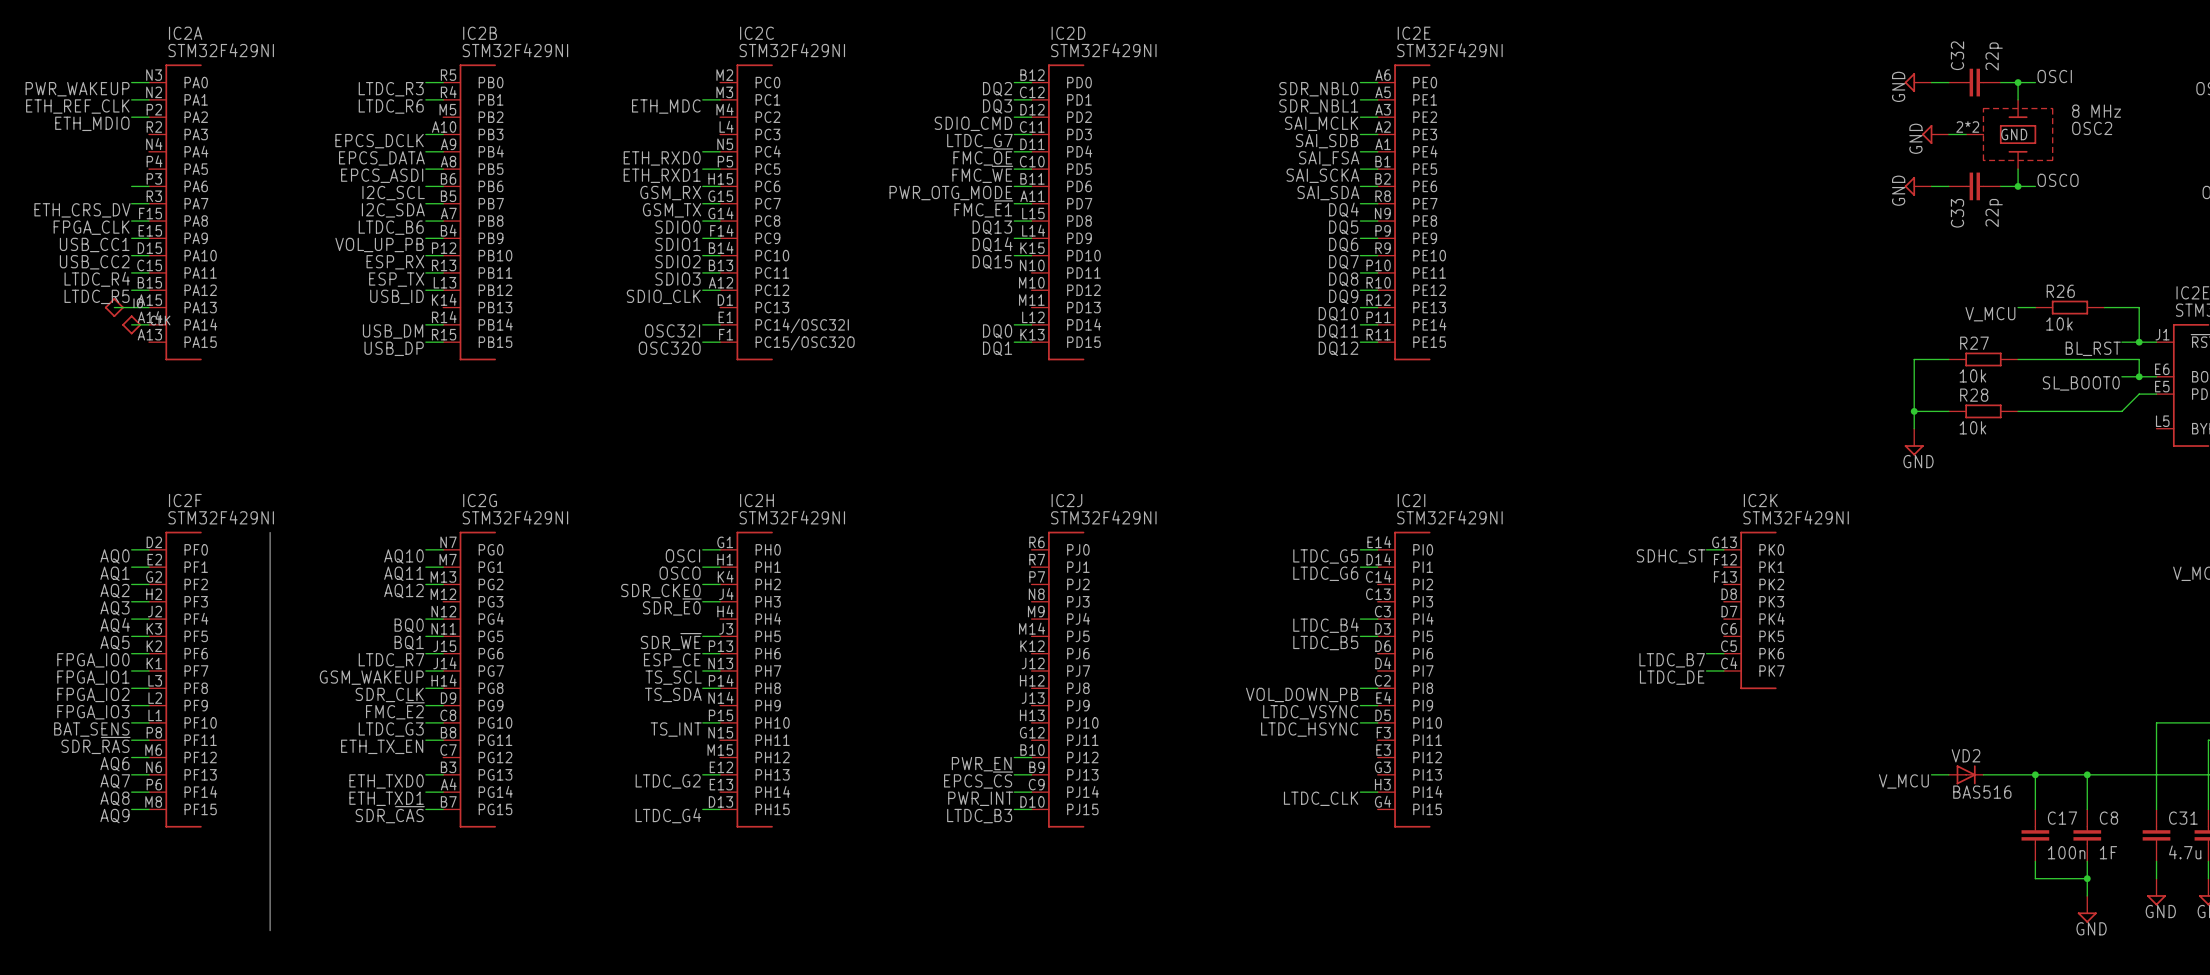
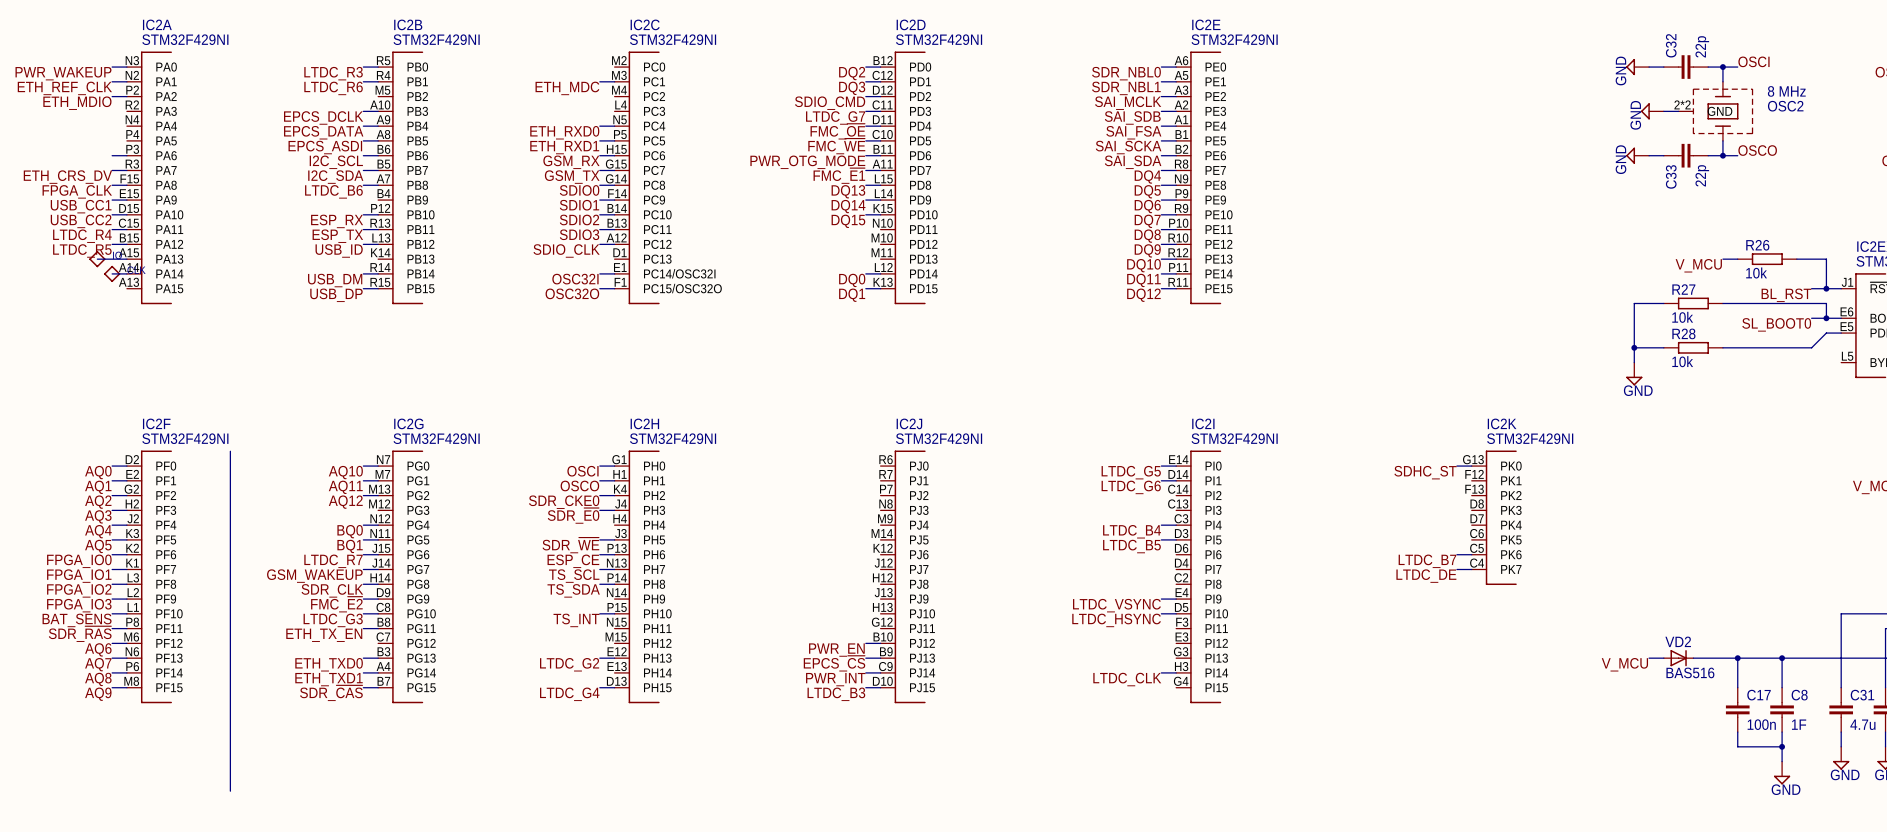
wire: (425, 238) (443, 238) -> none
label: VOL_UP_PB (379, 244) -> none
wire: (1360, 688) (1377, 688) -> none
label: VOL_DOWN_PB (1302, 694) -> none

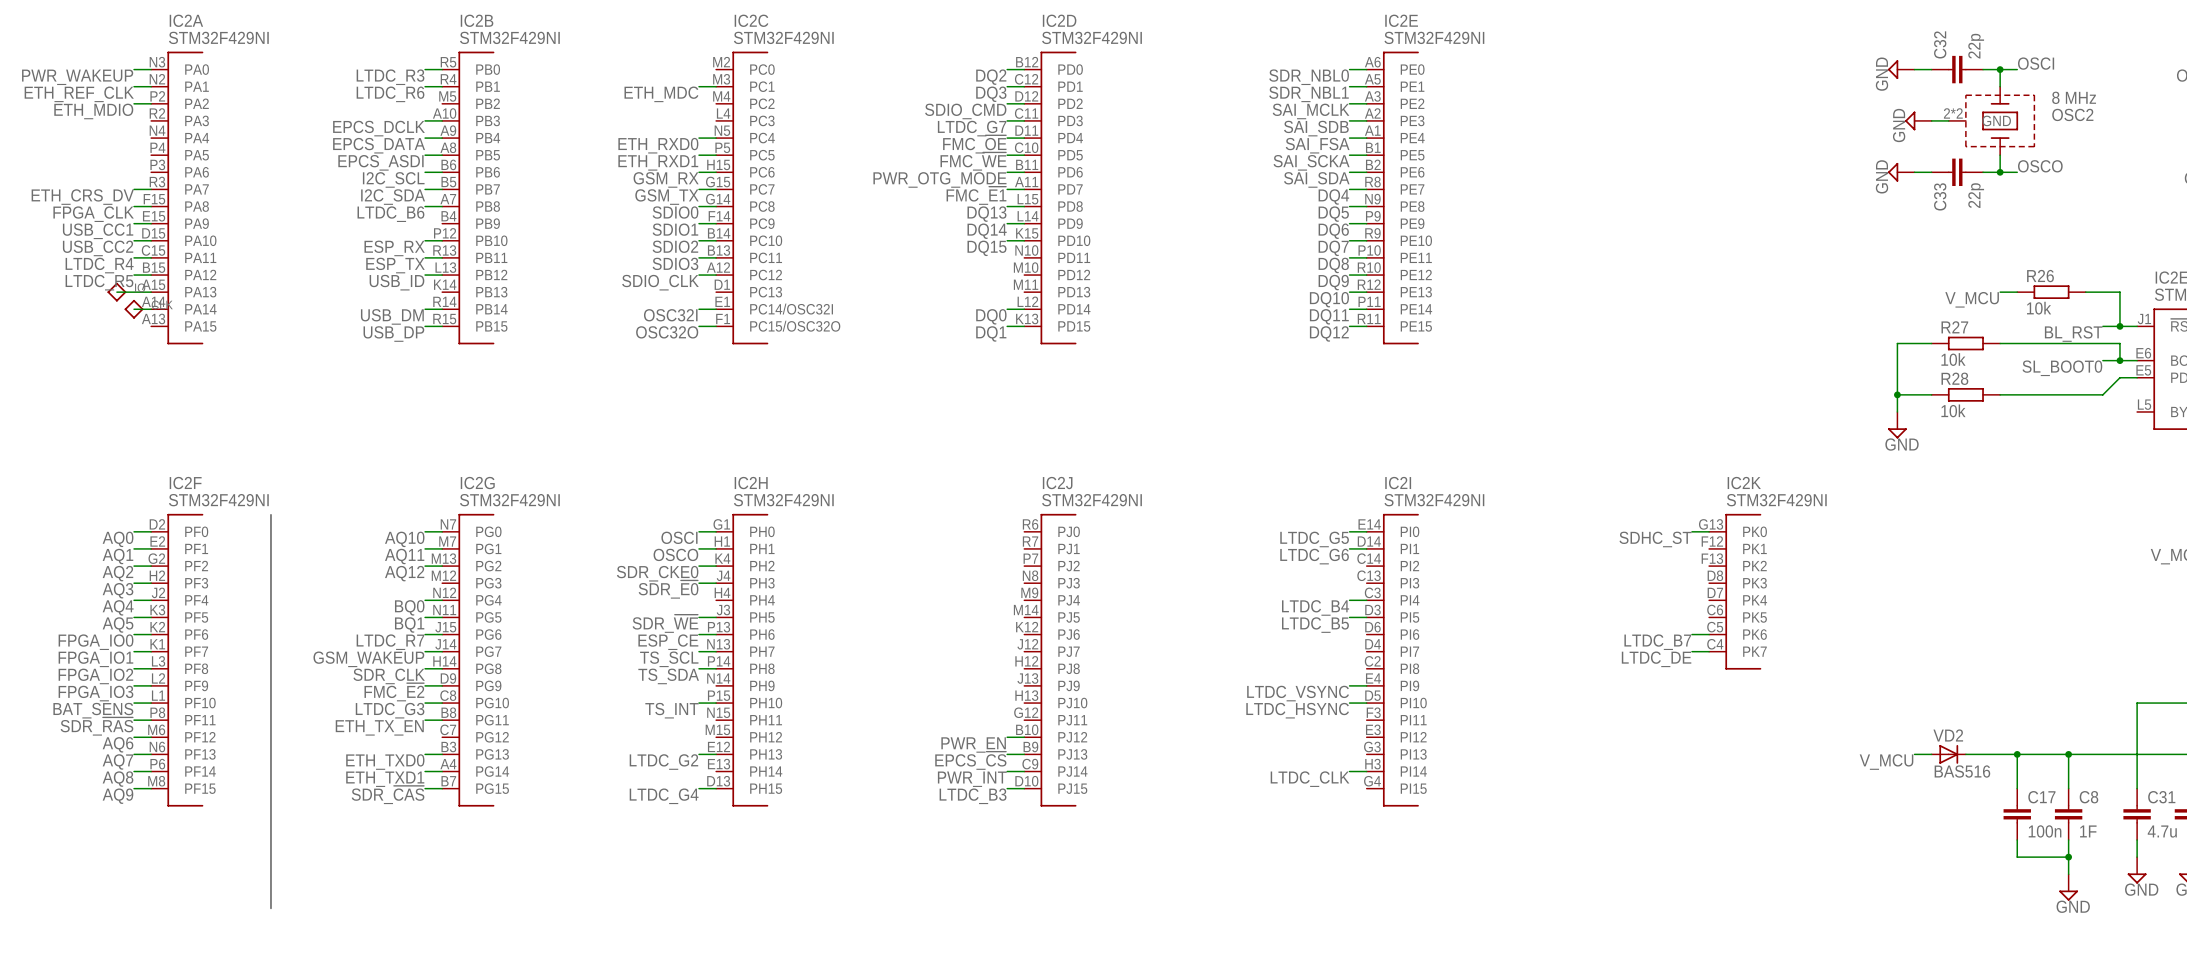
wire: (112, 155) (126, 155) -> none

